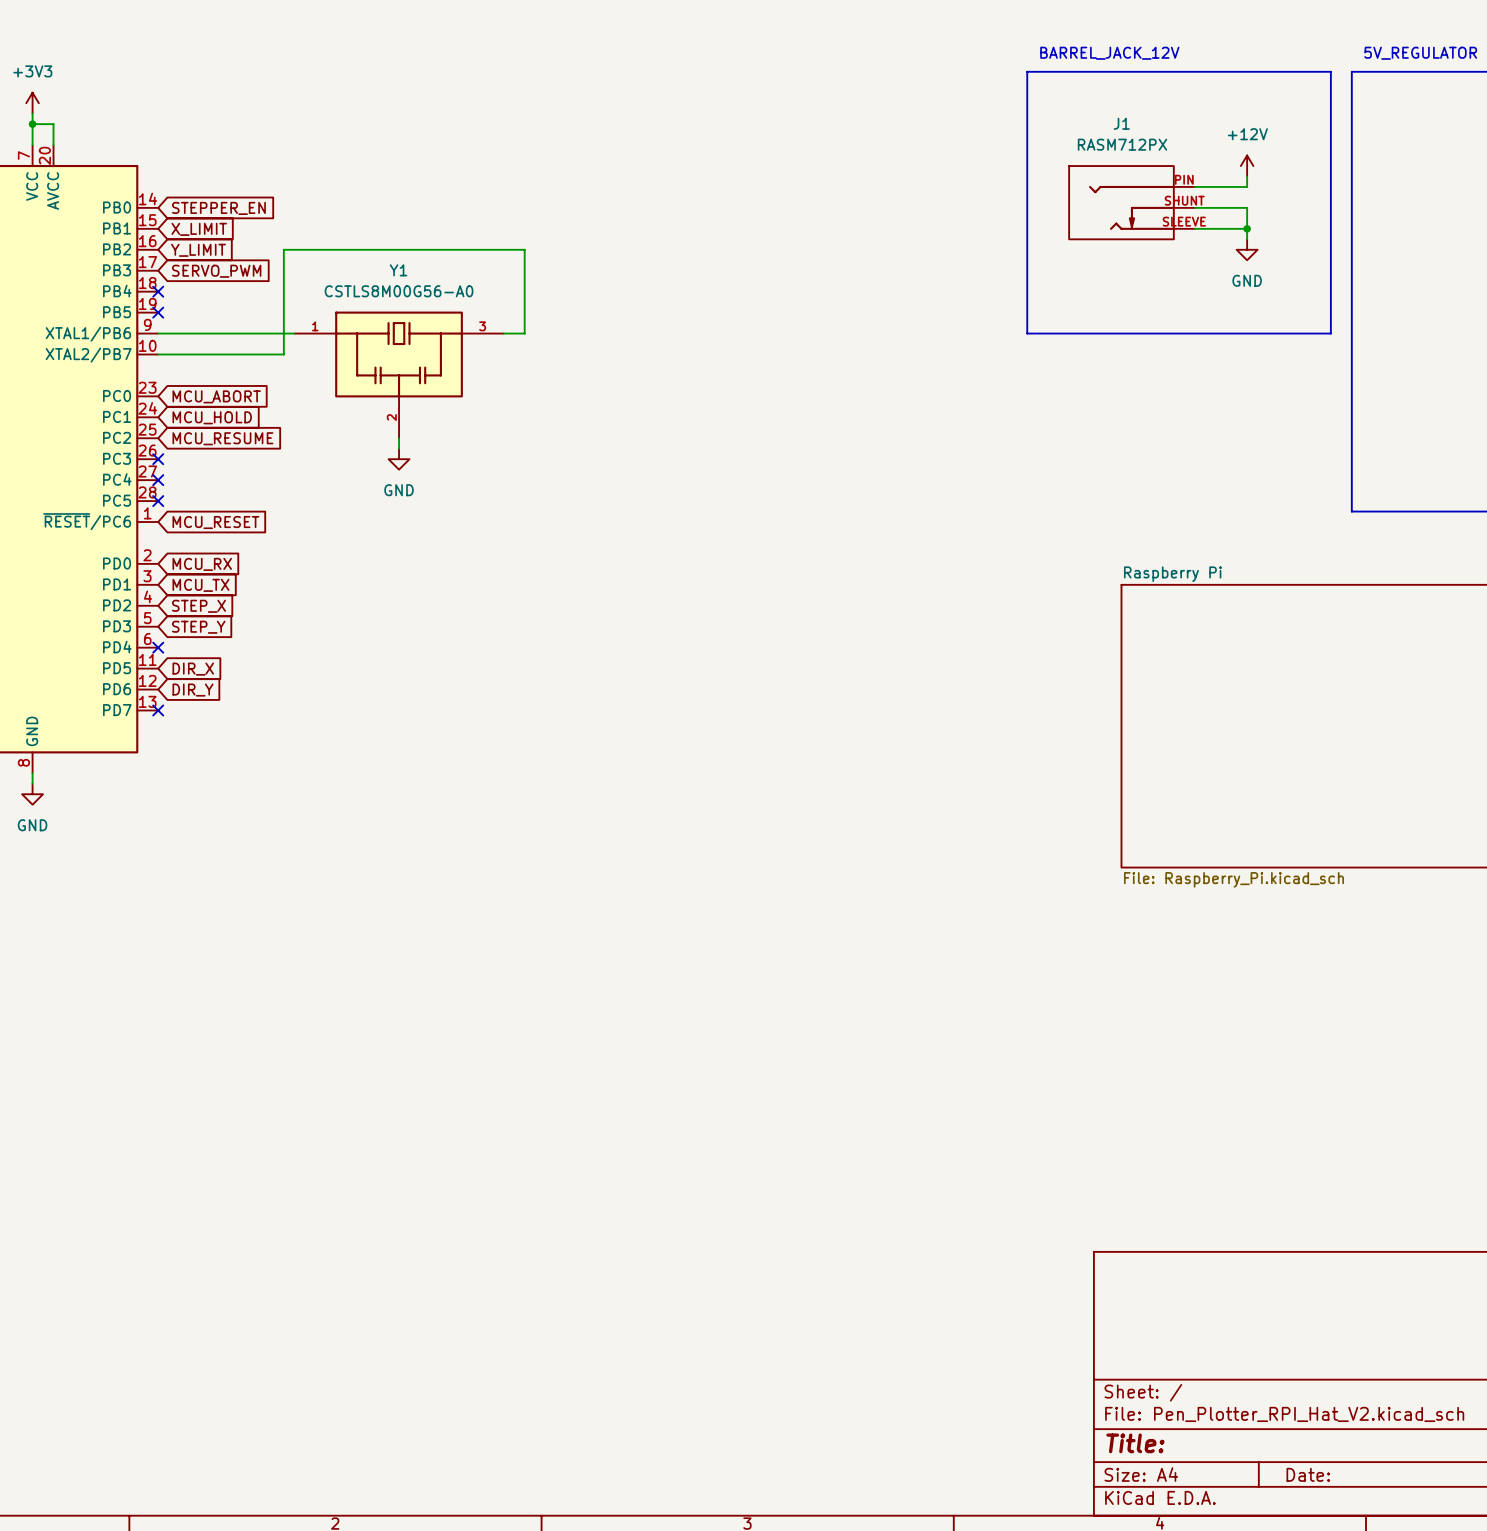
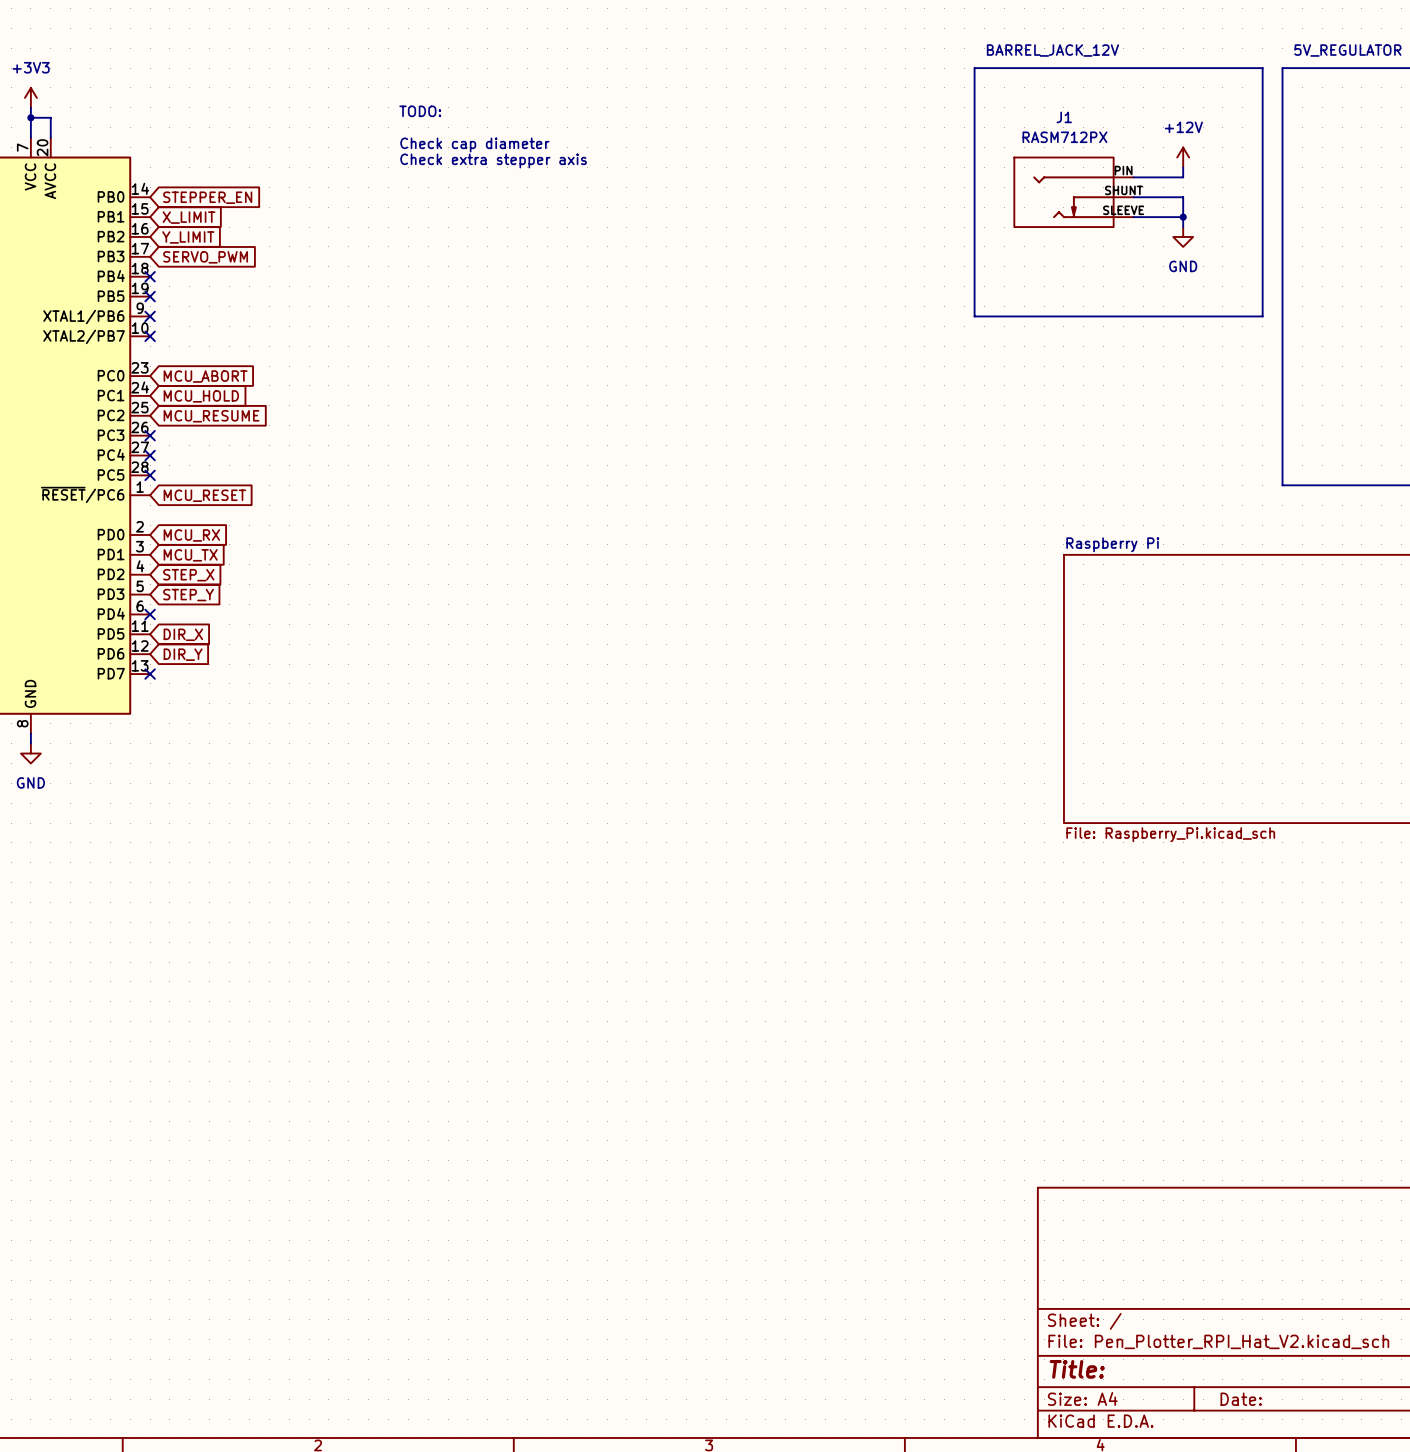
text: none -> TODO: (420, 111)
text: none -> Check cap diameter (474, 144)
text: none -> Check extra stepper axis (493, 160)
wire: (158, 333) (294, 333) -> none
no-connect mark: none -> (150, 316)
wire: (503, 333) (524, 333) (524, 249) (283, 249) (283, 354) (158, 354) -> none
no-connect mark: none -> (150, 336)
Y1: CSTLS8M00G56-A0 (399, 374) -> none
wire: (399, 438) (399, 448) -> none
power symbol: GND (399, 459) -> none

